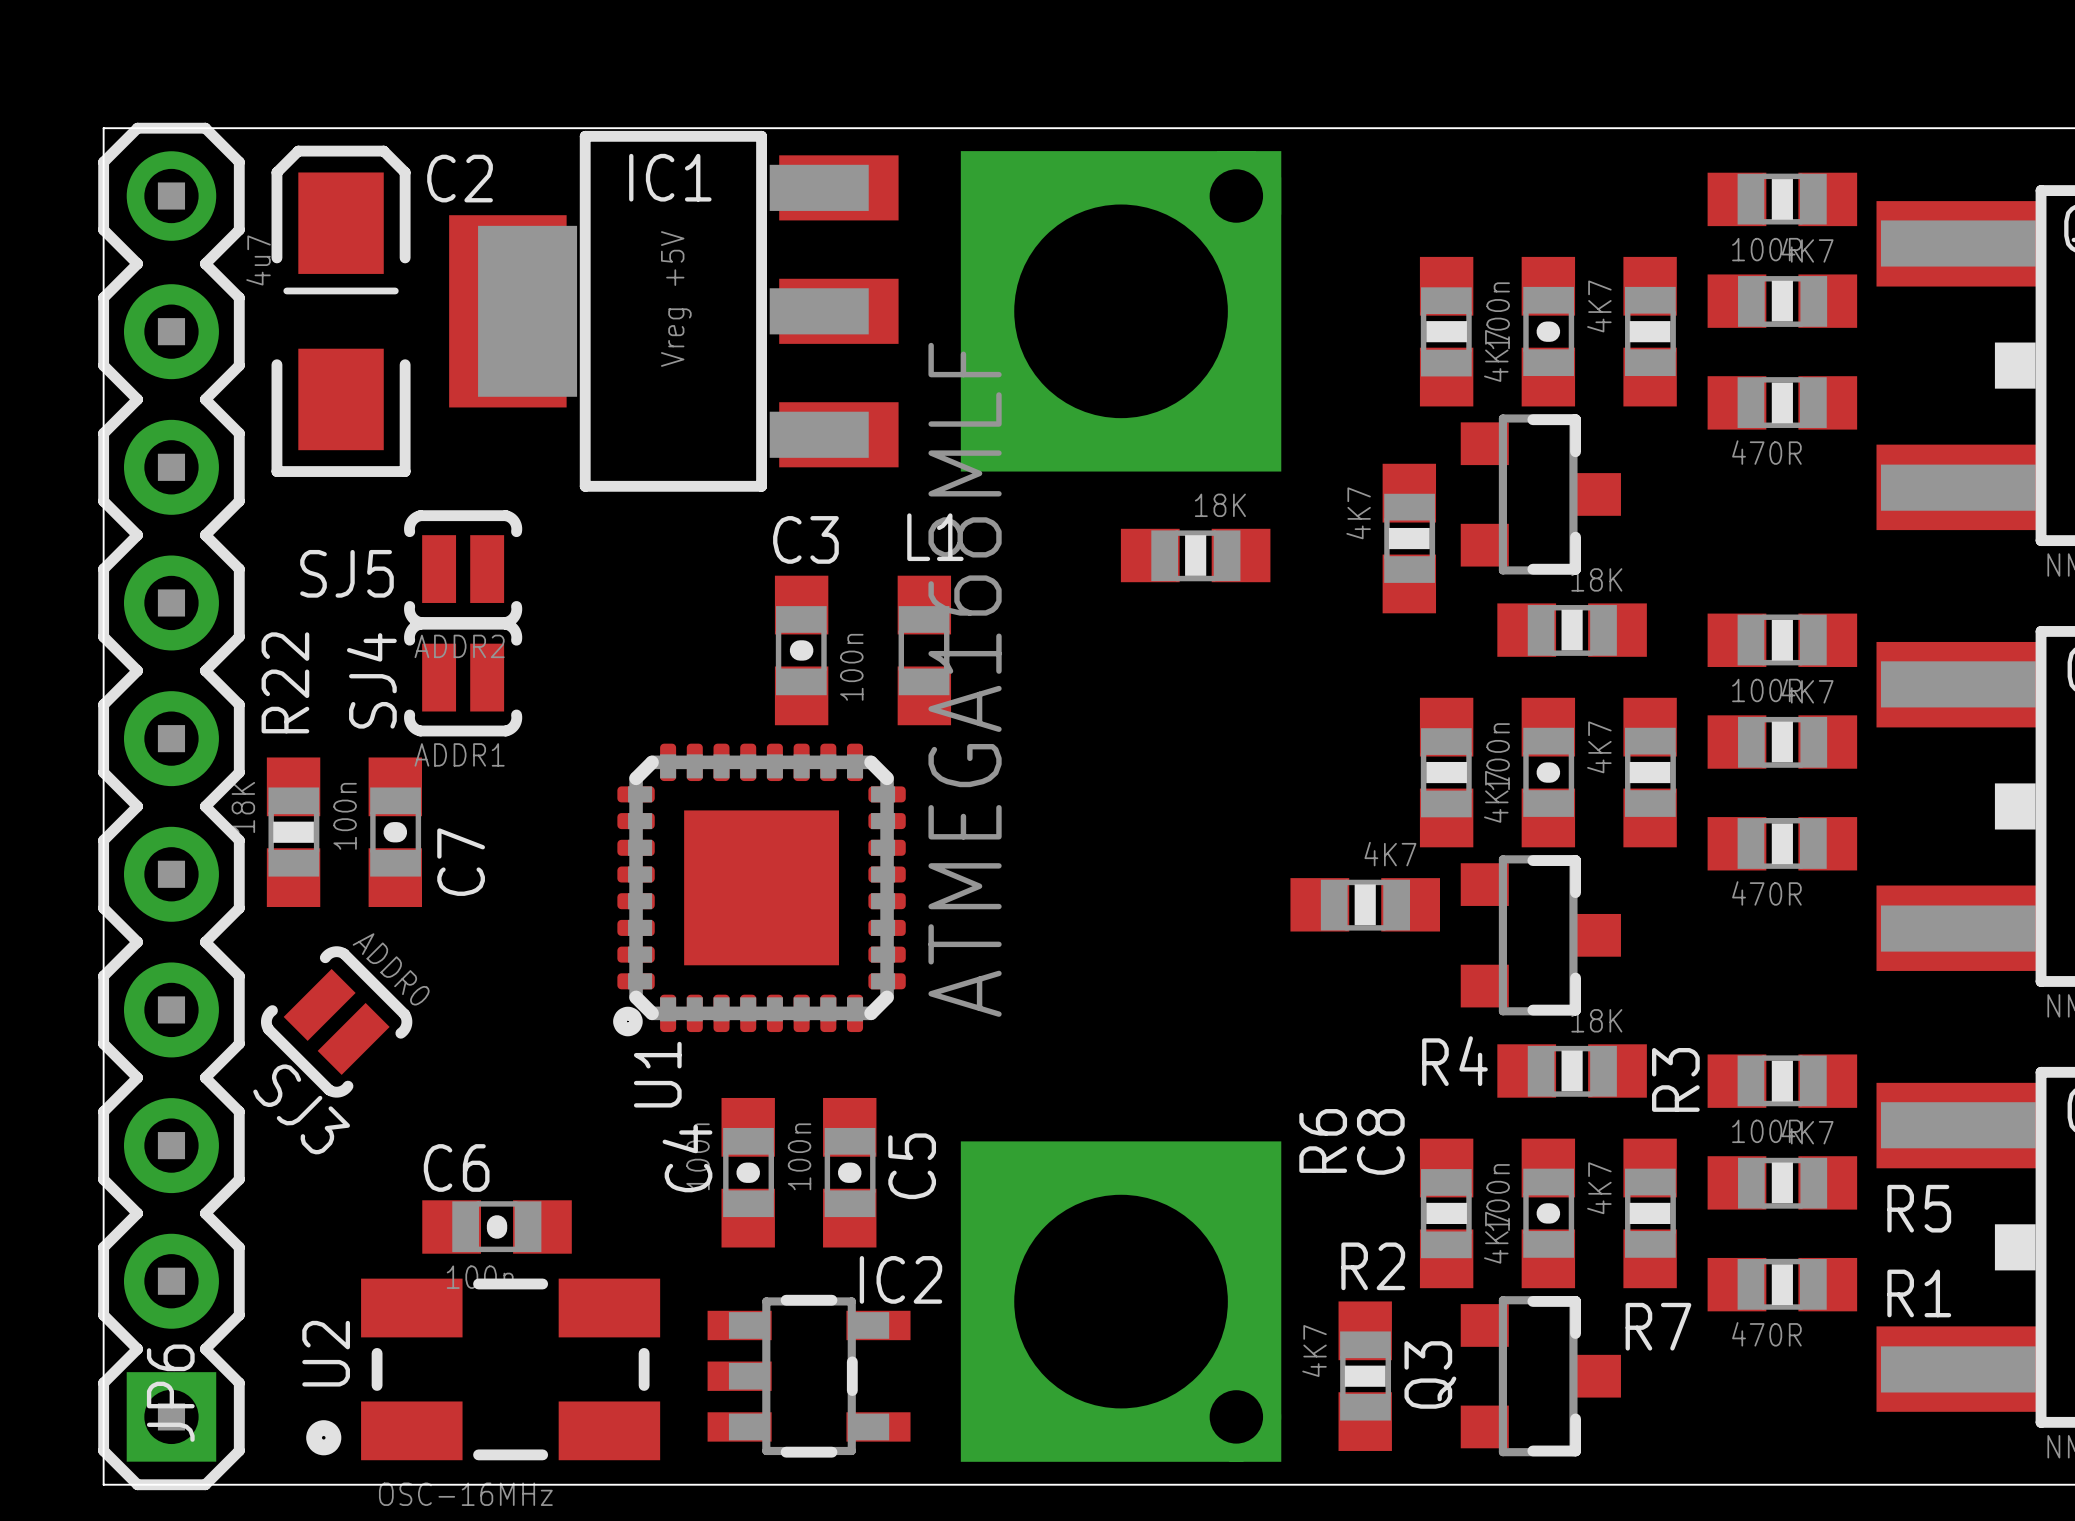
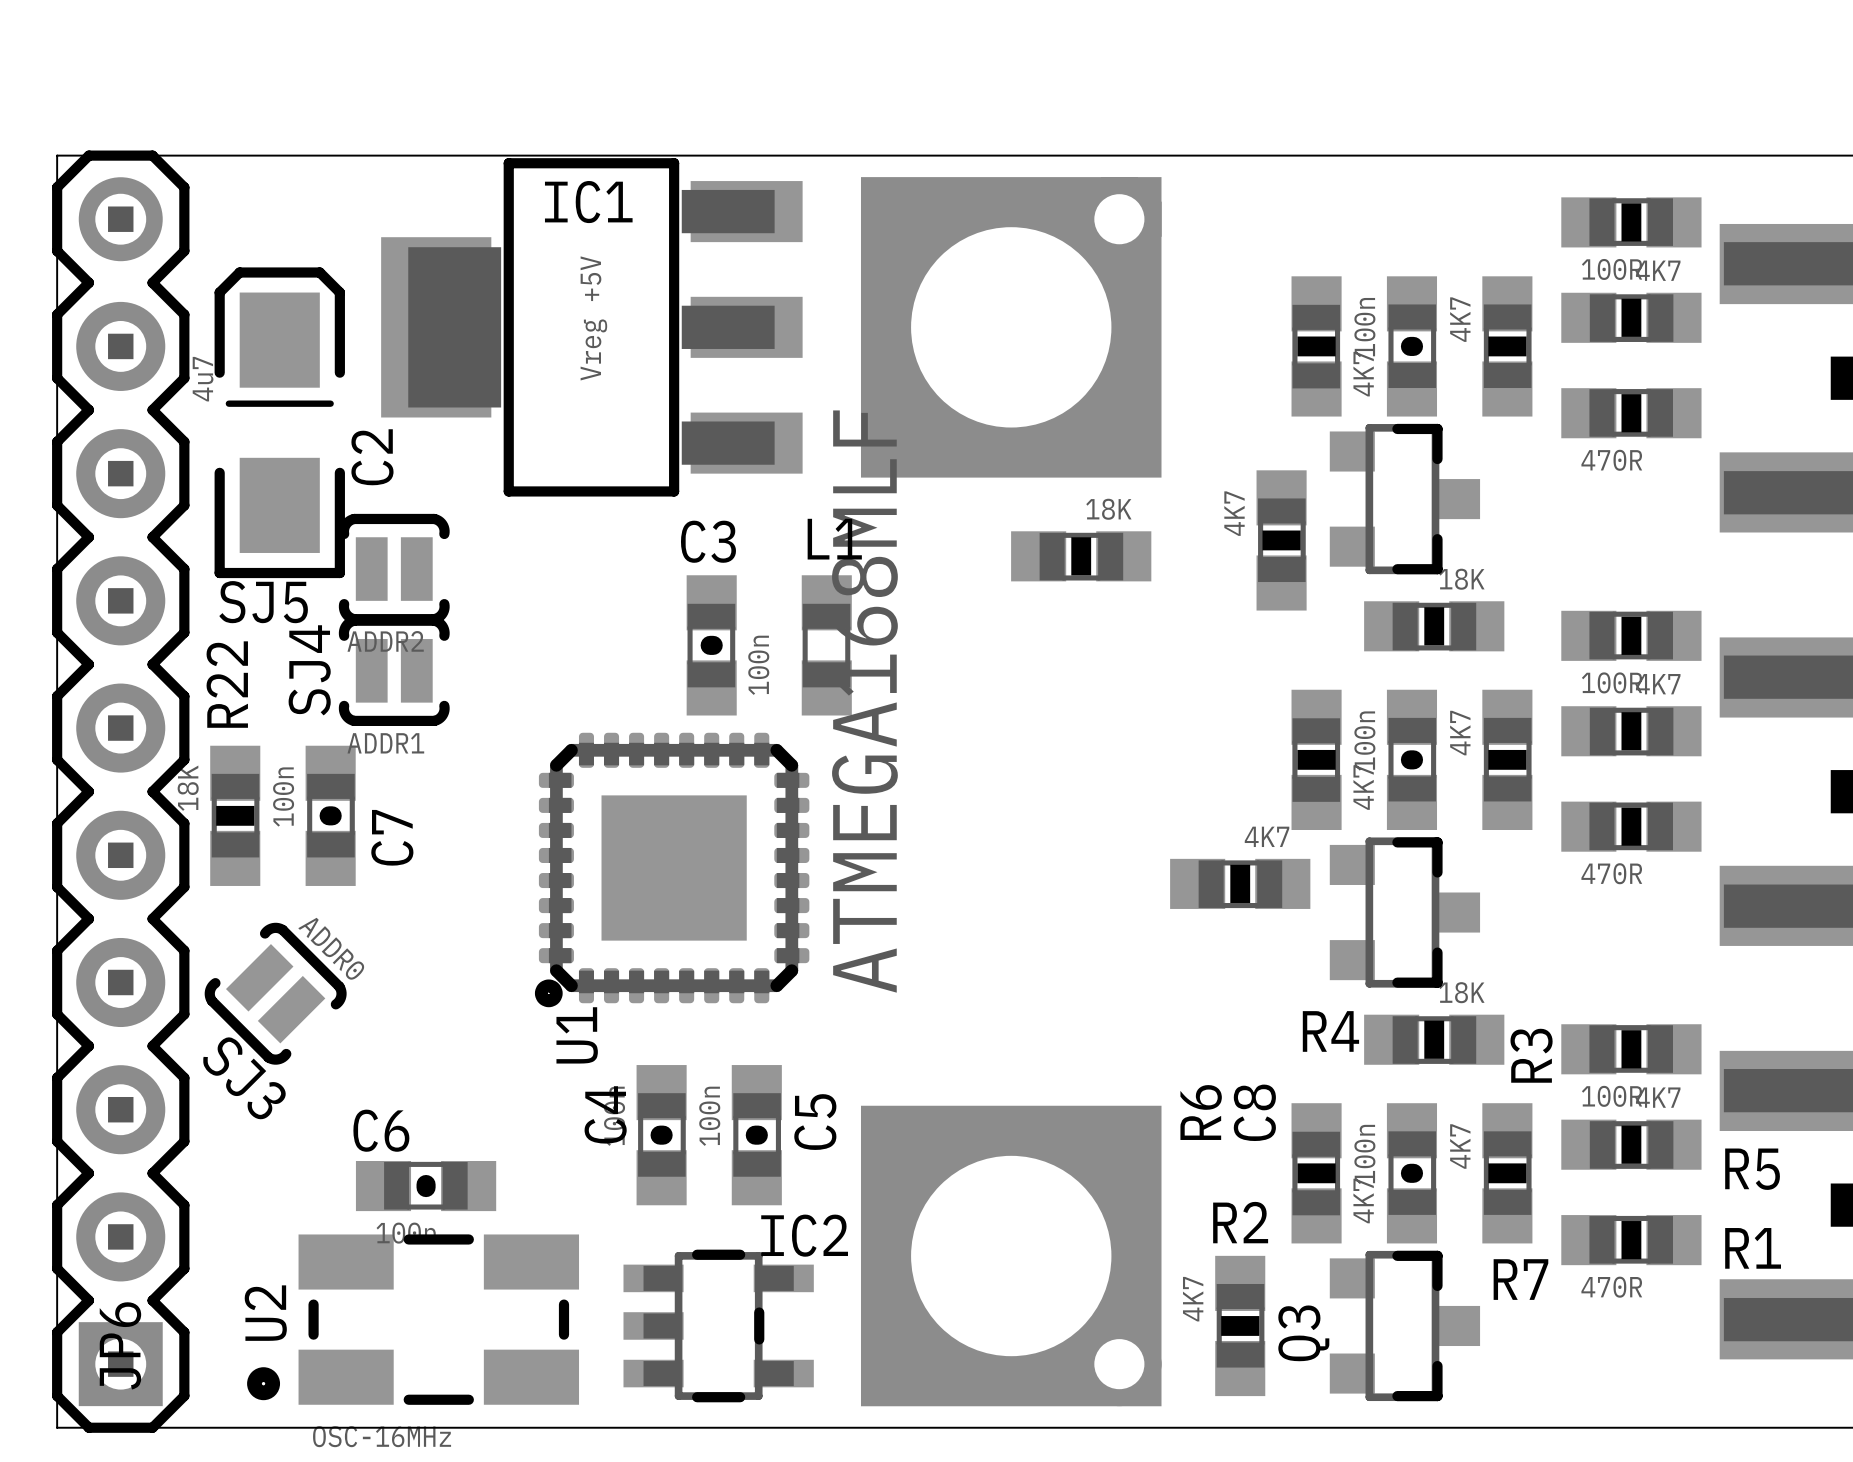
C2 name rotation: 0° (460, 178) -> 90° counterclockwise (372, 457)
C2 name position: C2 (460, 178) -> C2 (372, 457)
C2 position: (341, 311) -> (279, 422)
SJ5 name position: SJ5 (346, 573) -> SJ5 (263, 602)

